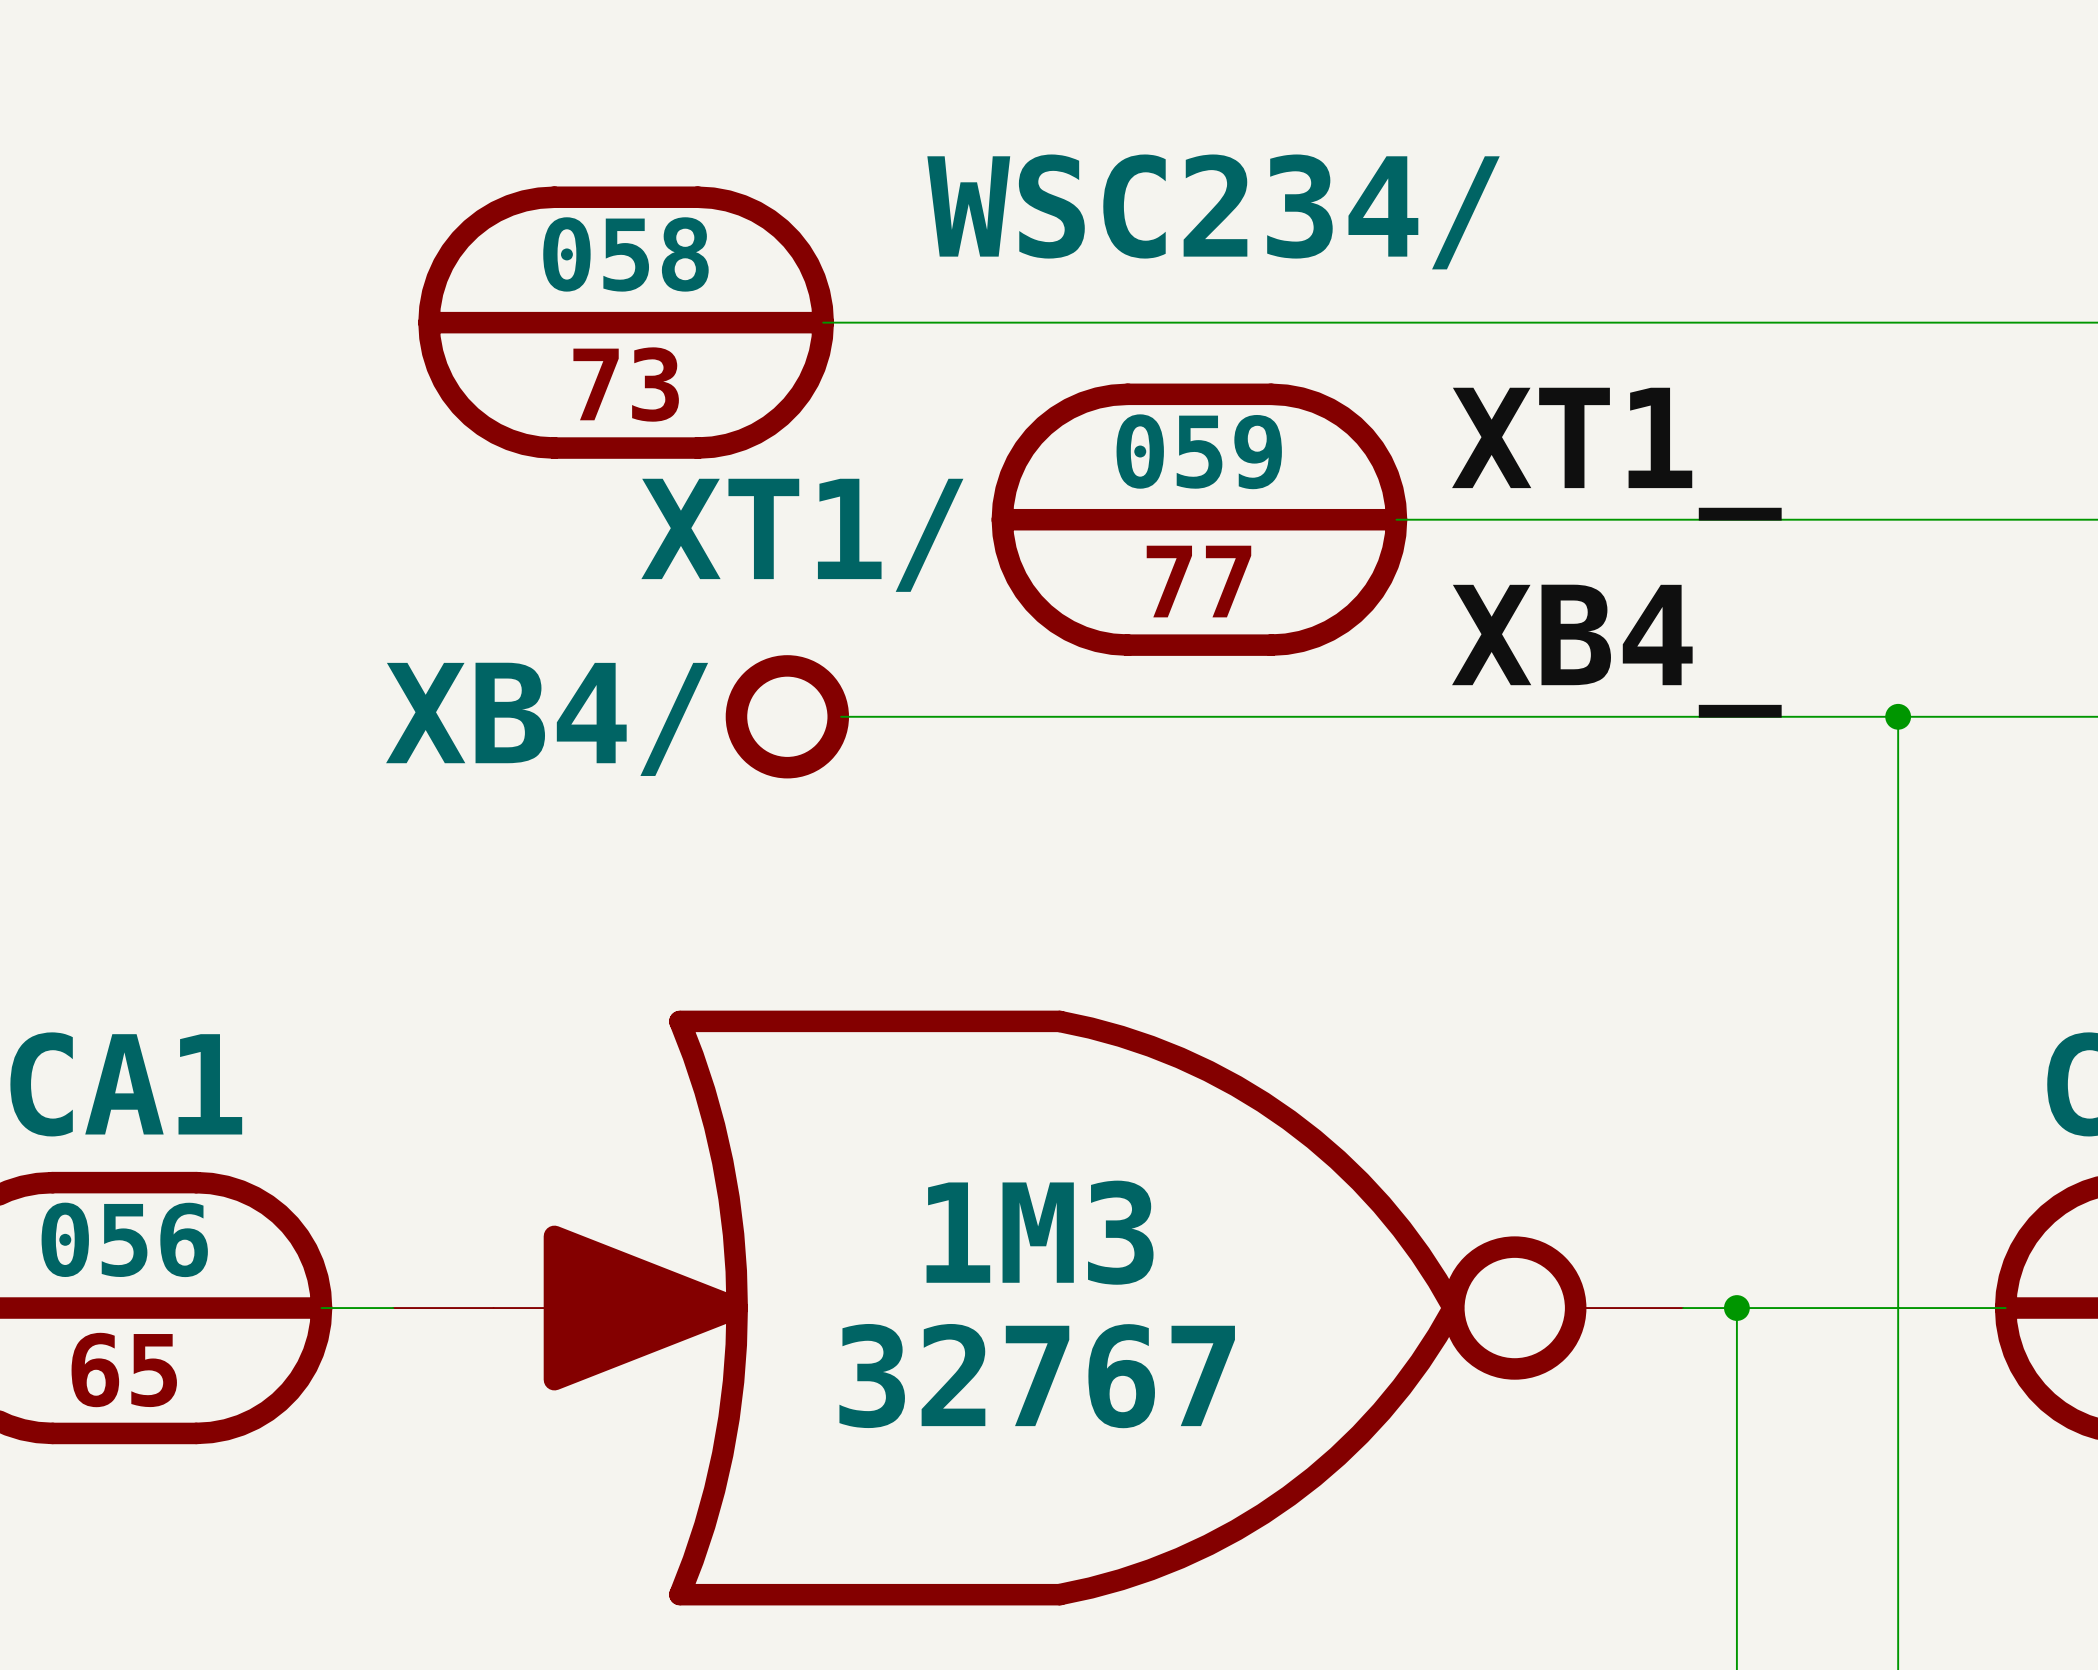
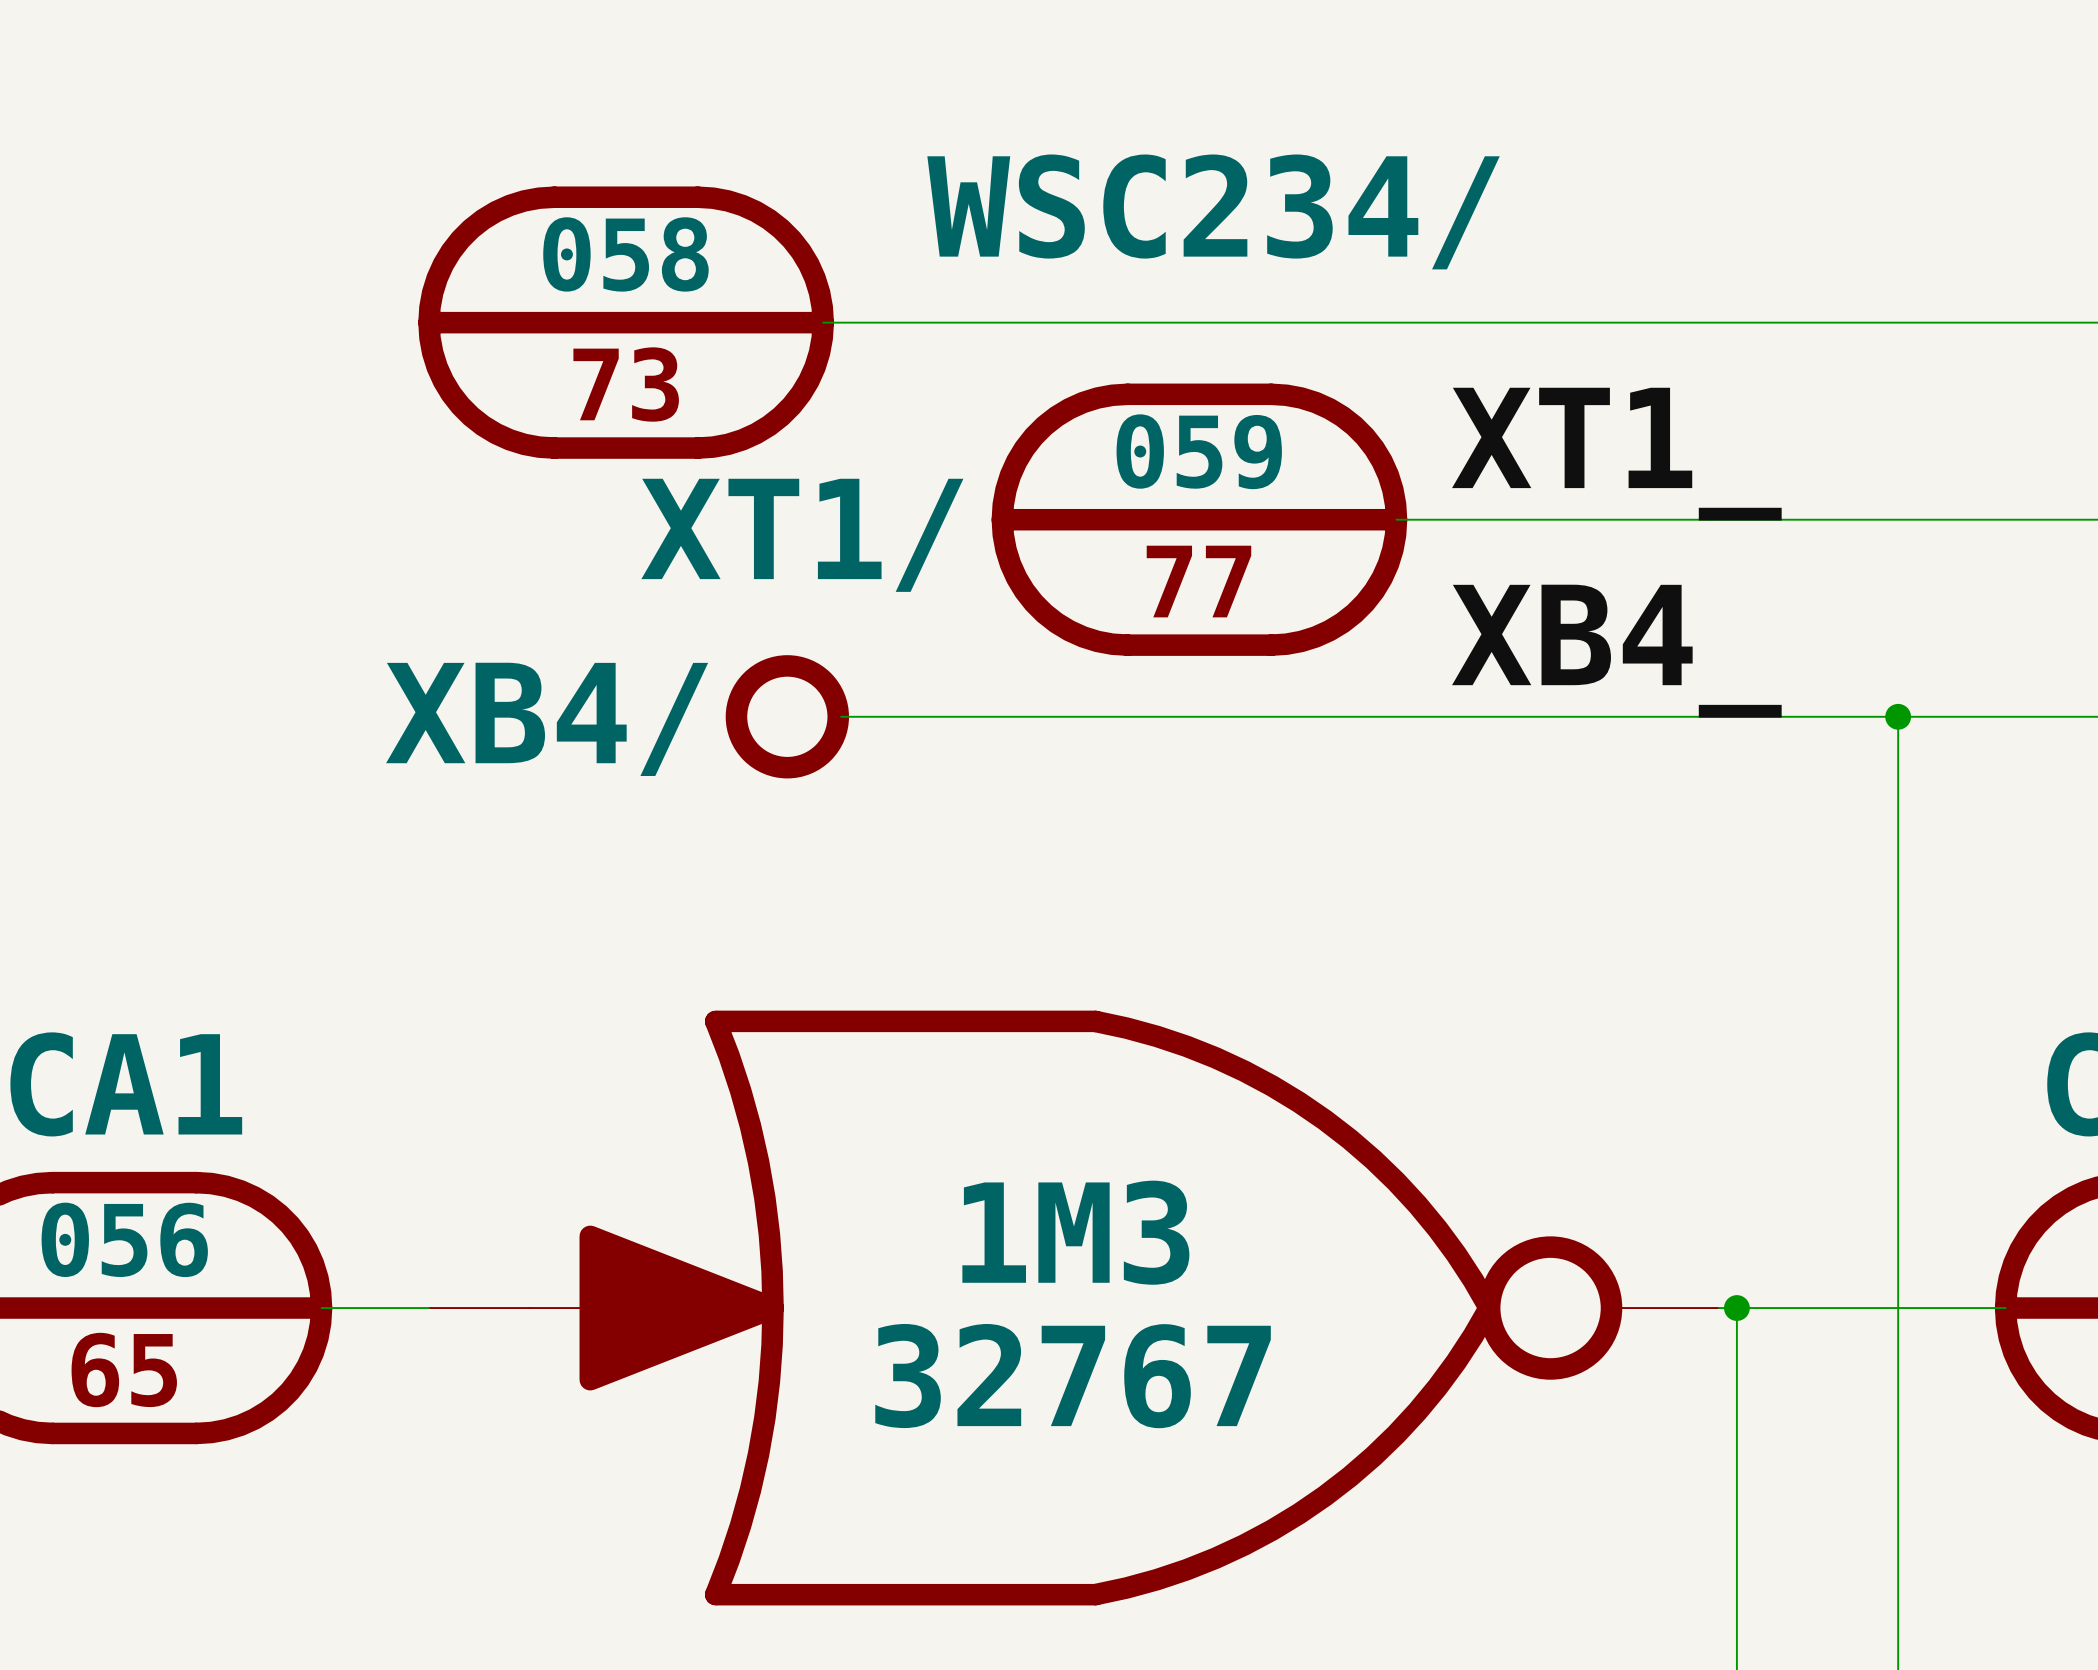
part position: (1038, 1308) -> (1074, 1308)

